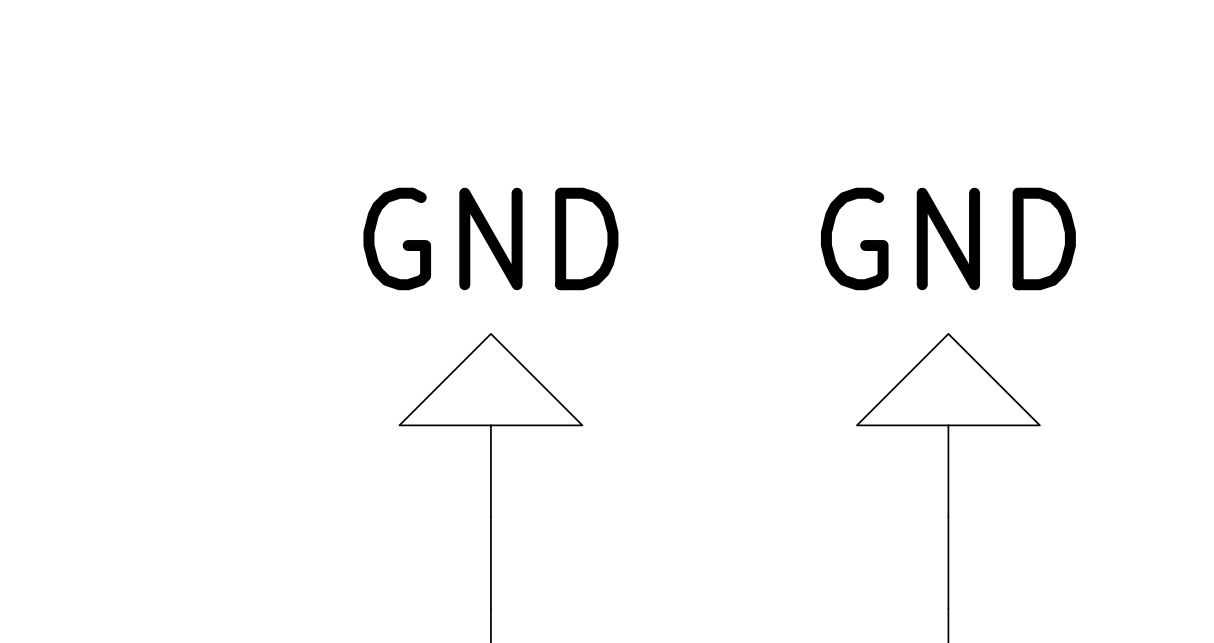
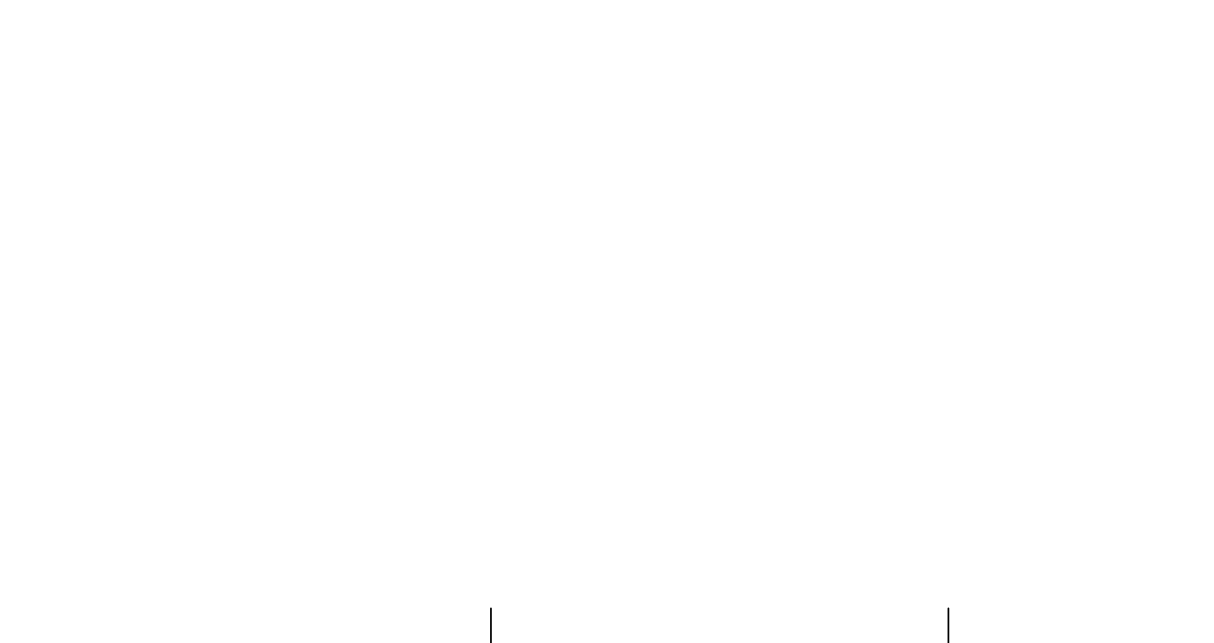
power symbol: GND (490, 425) -> none
power symbol: GND (948, 425) -> none
wire: (490, 516) (490, 608) -> none
wire: (948, 516) (948, 608) -> none

